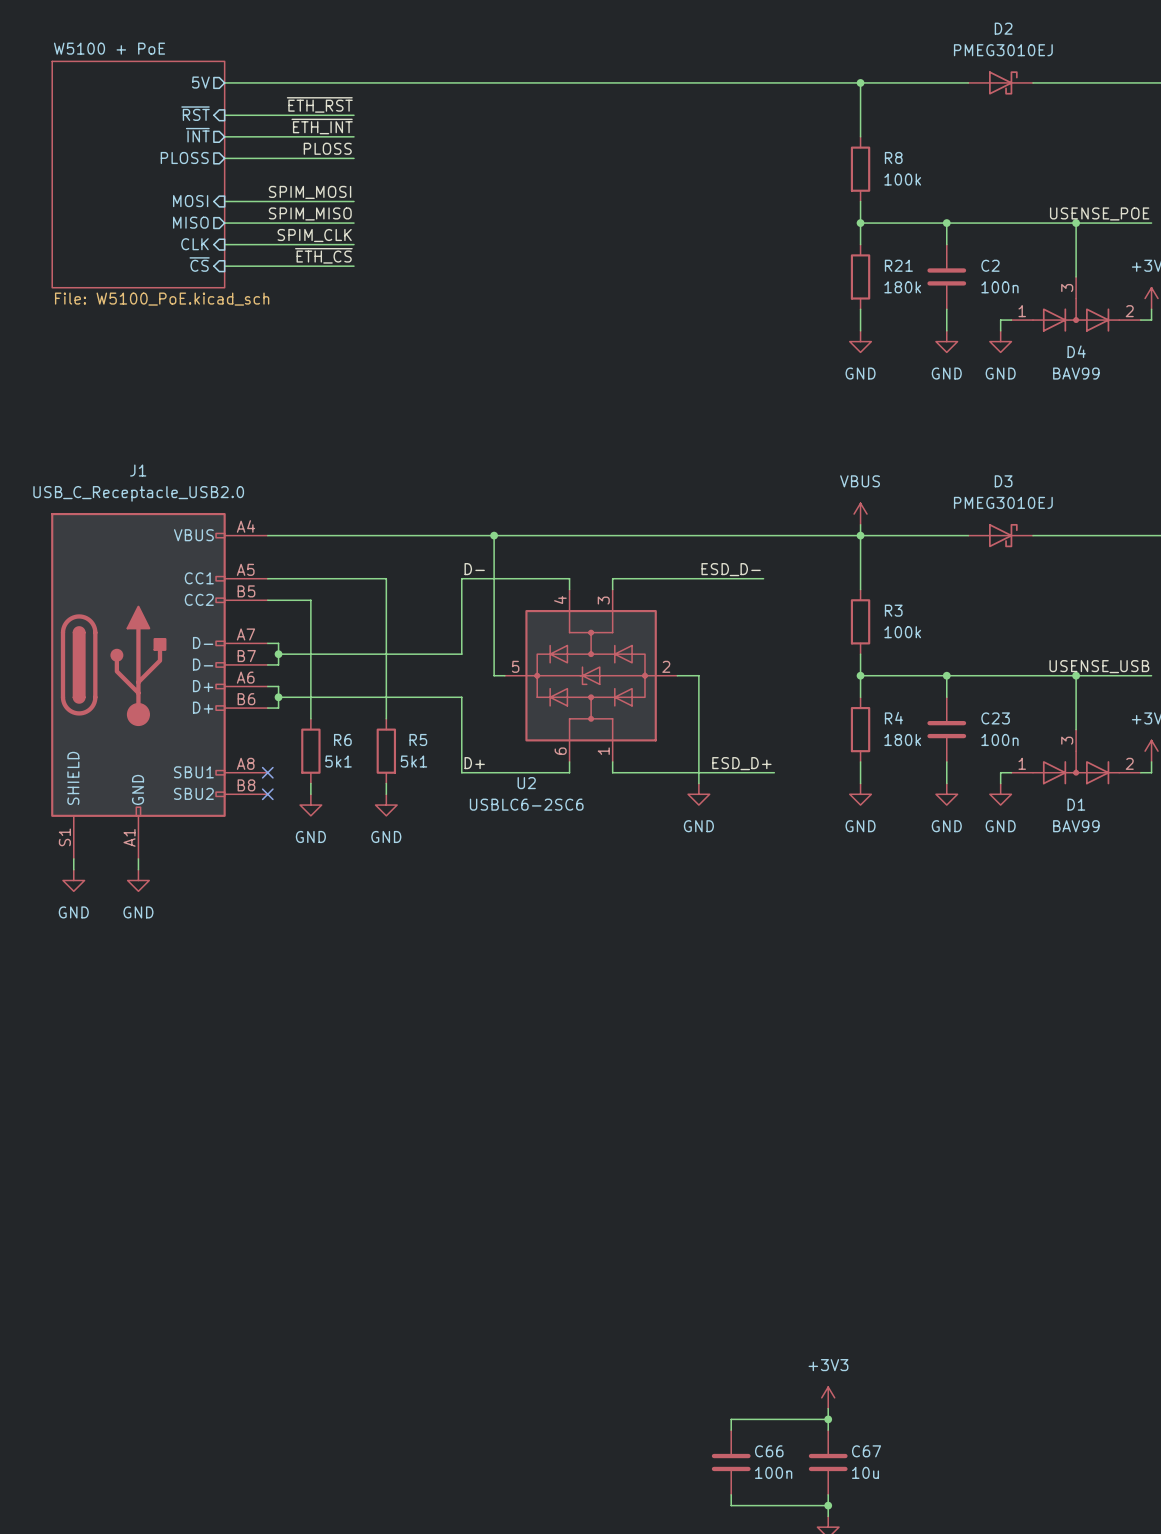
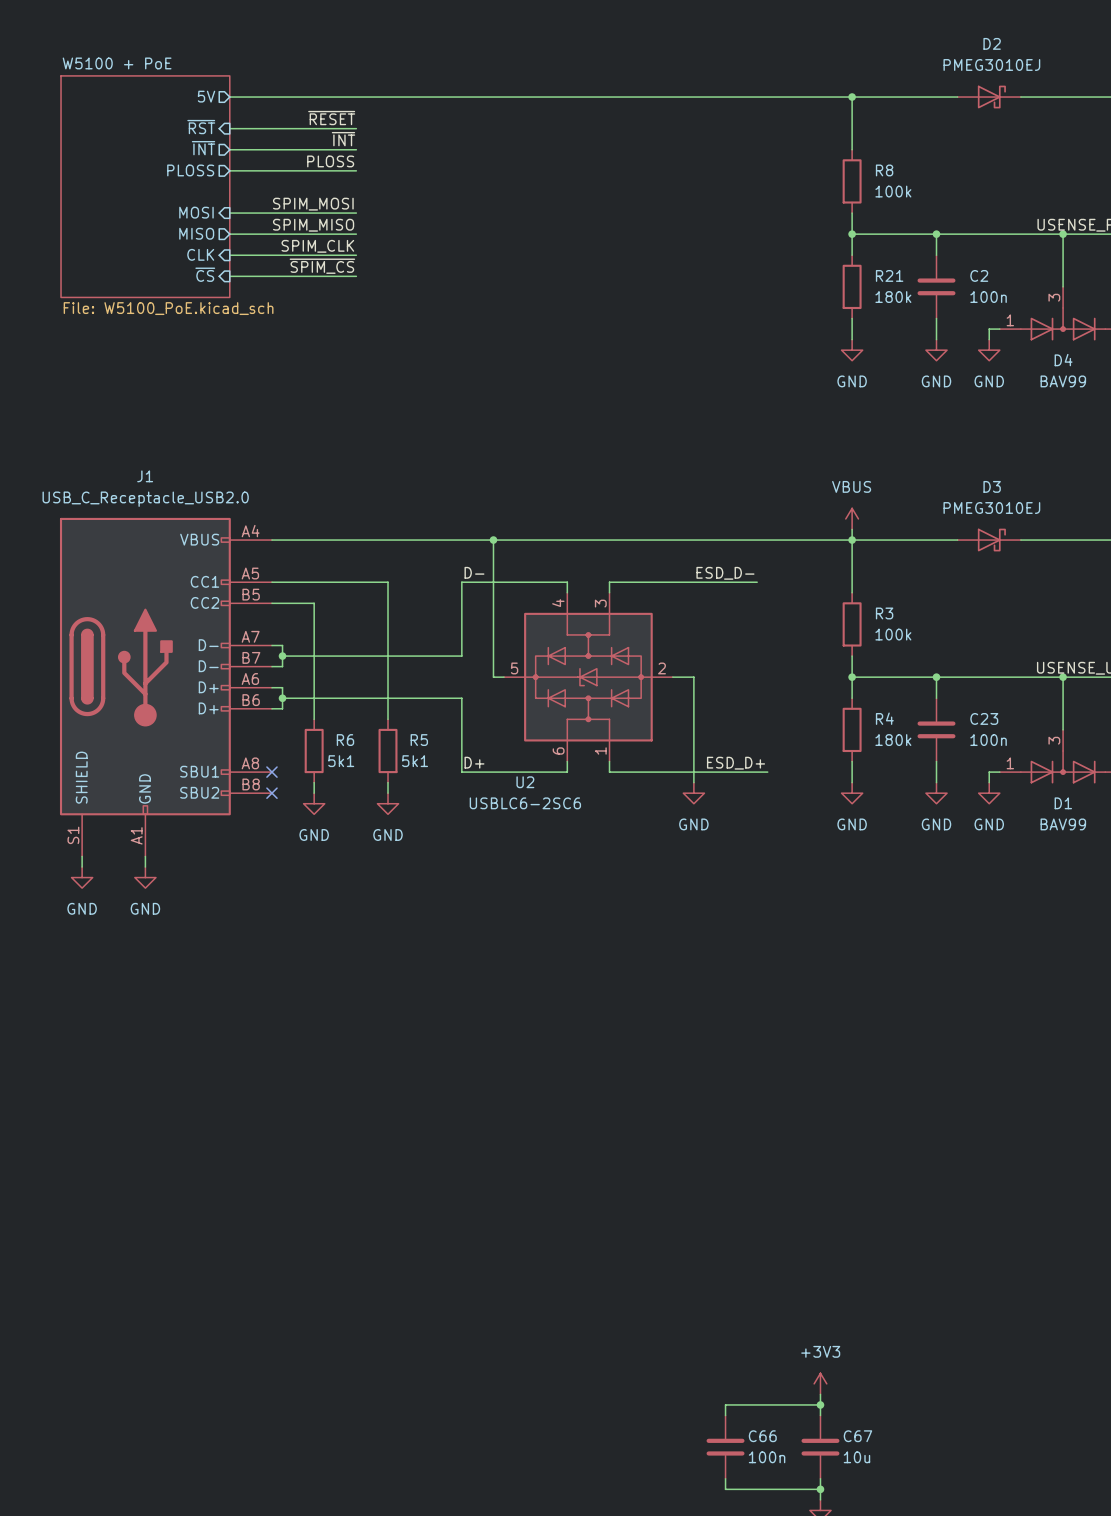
label: ~{ETH_RST} (319, 104) -> ~{RESET} (331, 118)
label: ~{ETH_INT} (322, 126) -> ~{INT} (343, 139)
label: ~{ETH_CS} (323, 255) -> ~{SPIM_CS} (322, 266)

